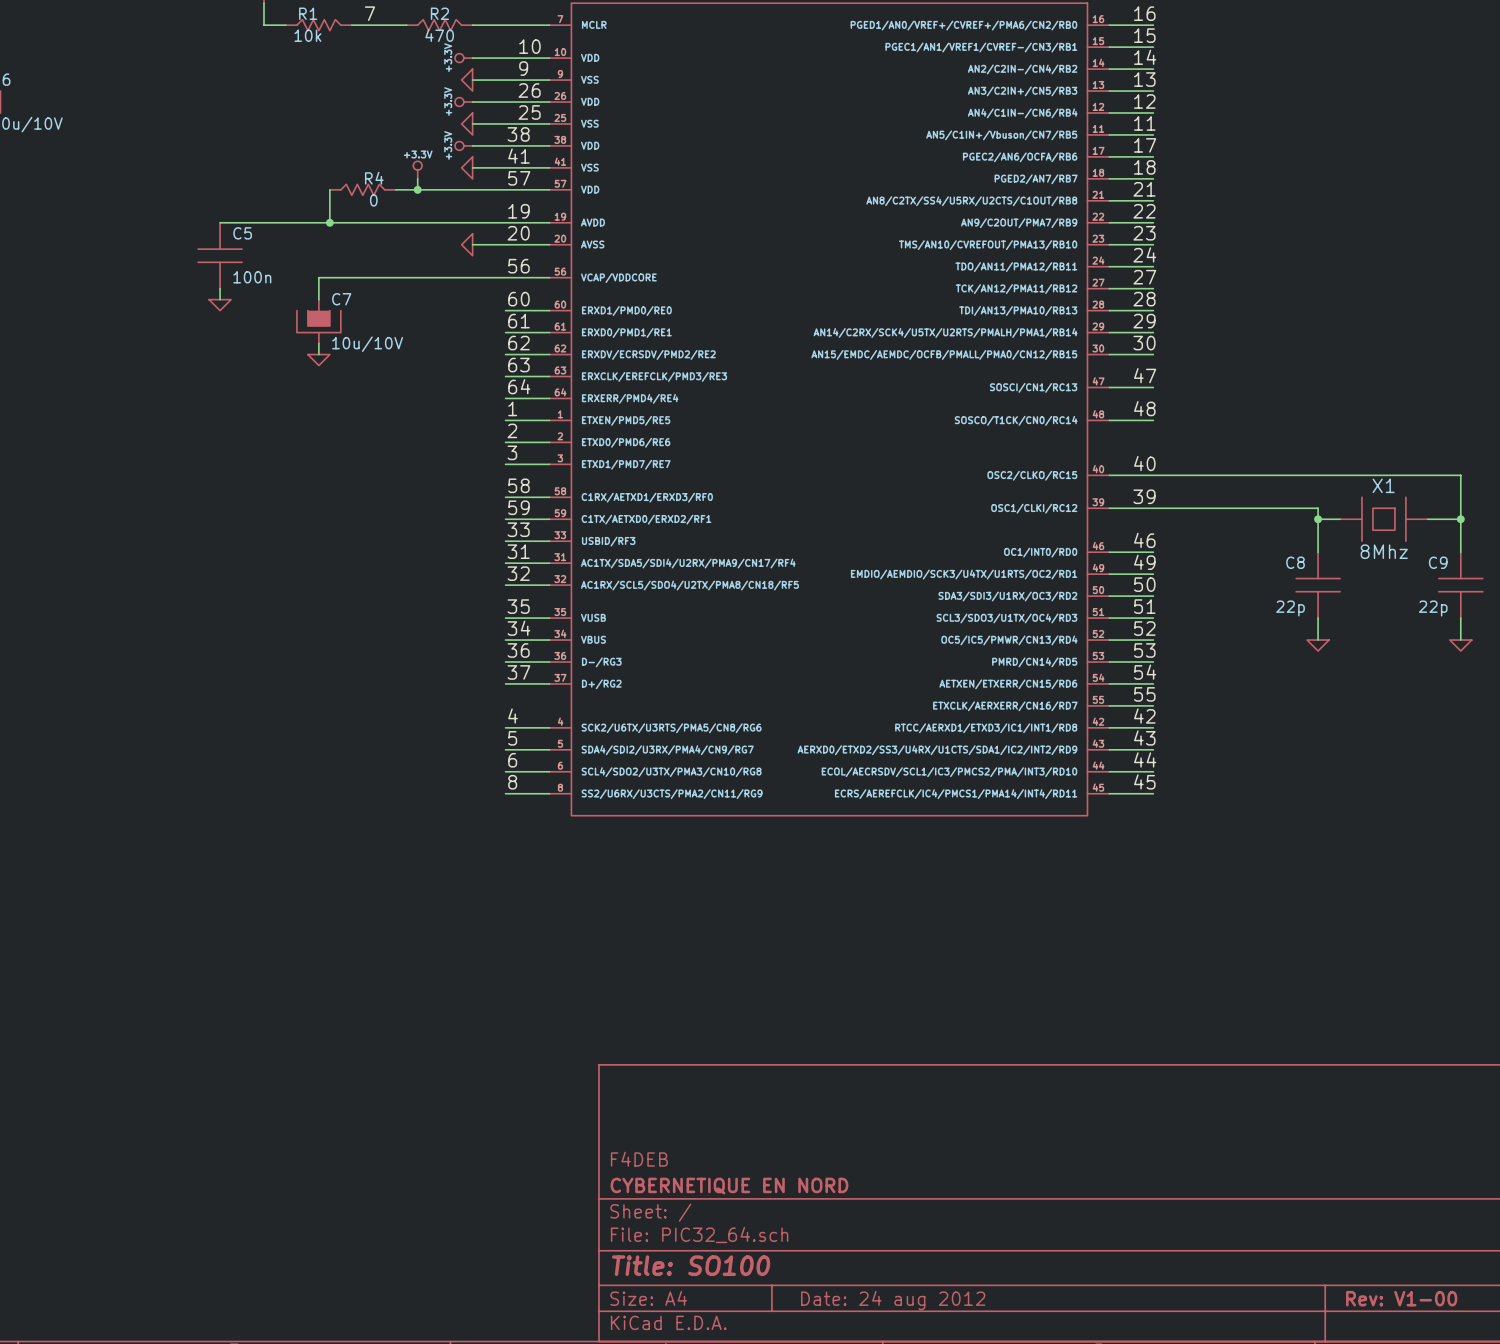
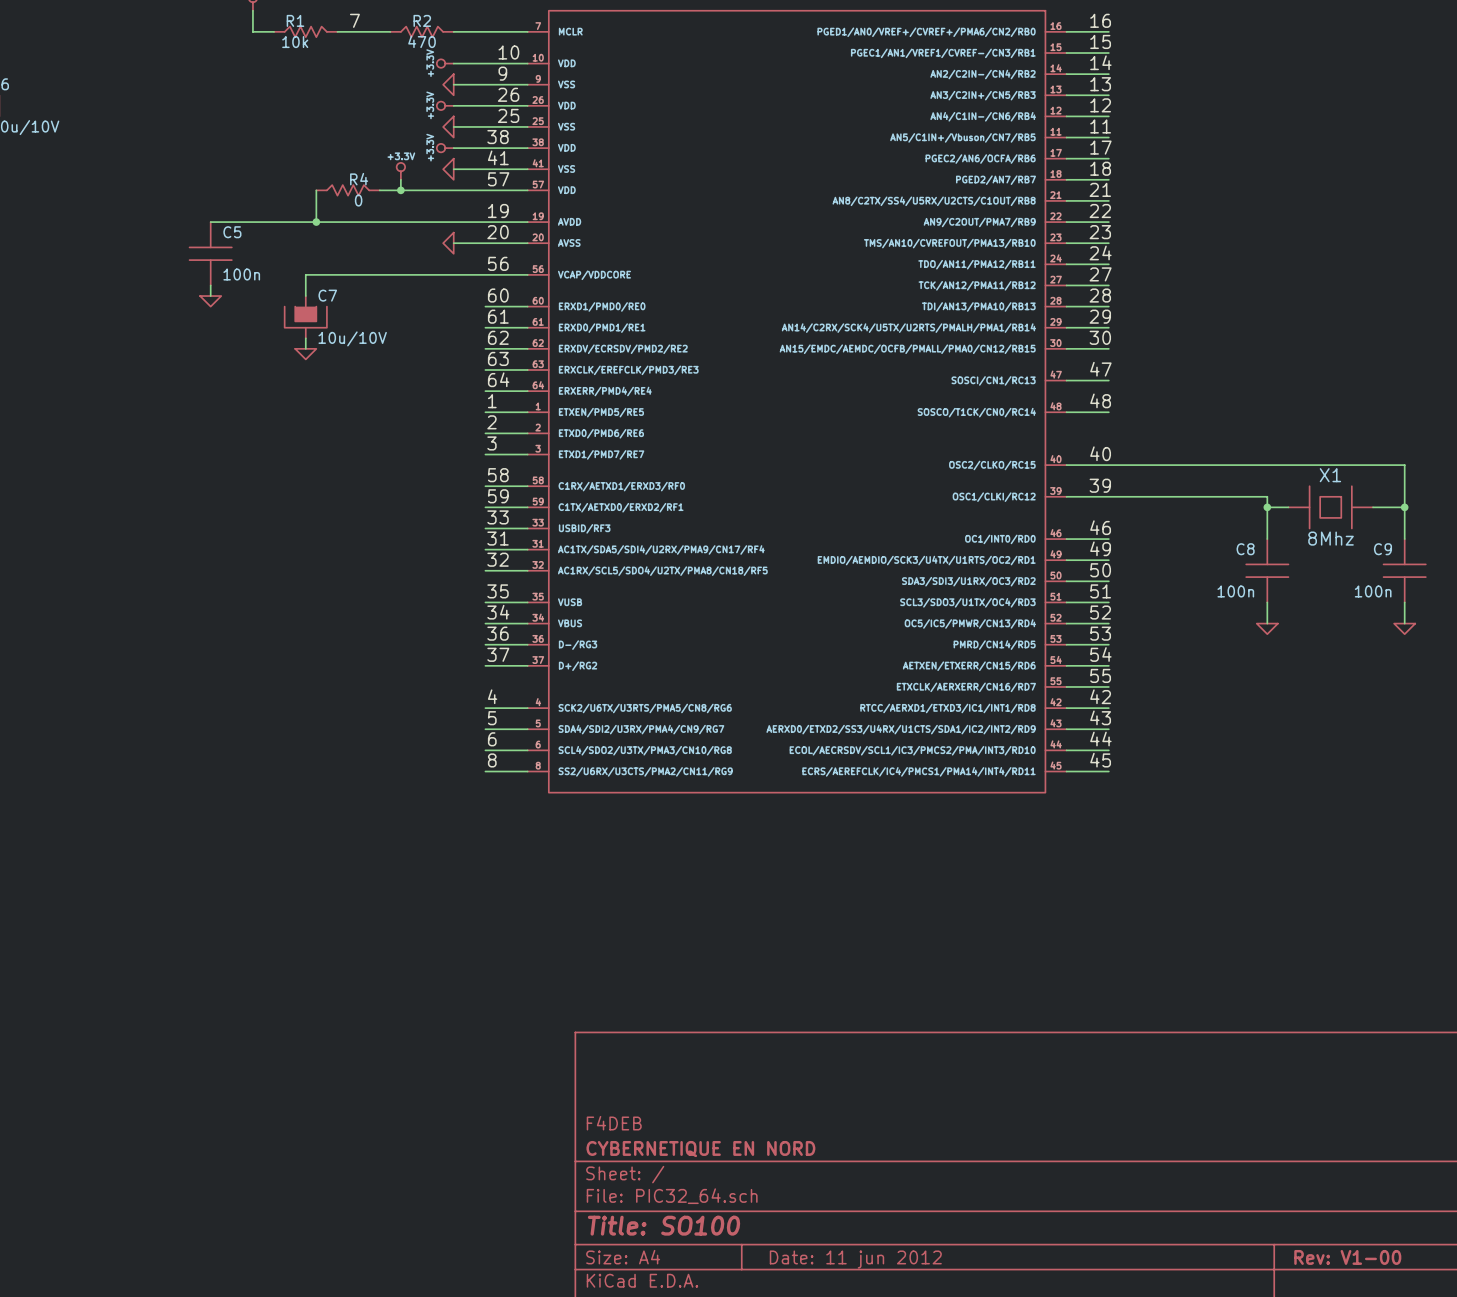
C8 value: 22p (1290, 608) -> 100n (1235, 591)
C9 value: 22p (1433, 608) -> 100n (1373, 591)
title block: Date: 24 aug 2012 (893, 1300) -> Date: 11 jun 2012 (855, 1259)

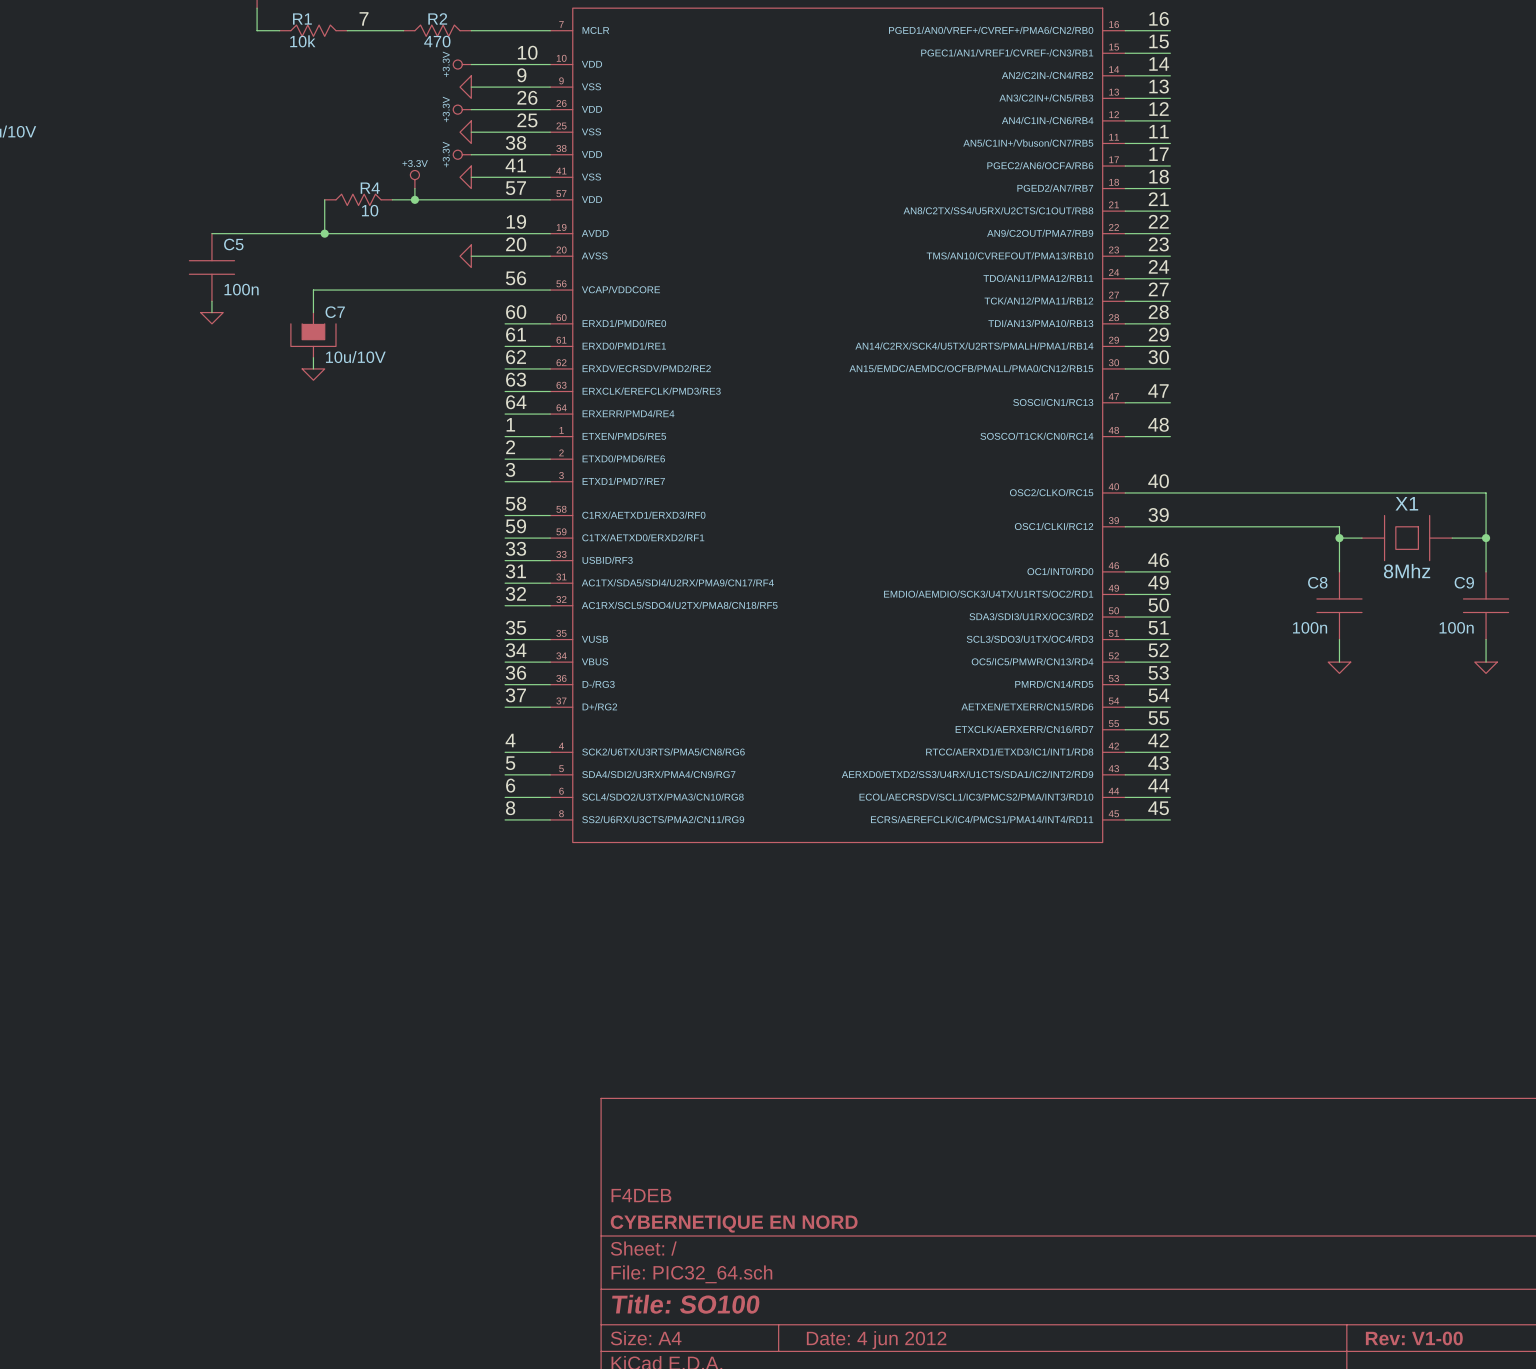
R4 value: 0 (358, 200) -> 10 (370, 210)
title block: Date: 11 jun 2012 (855, 1259) -> Date: 4 jun 2012 (876, 1340)

